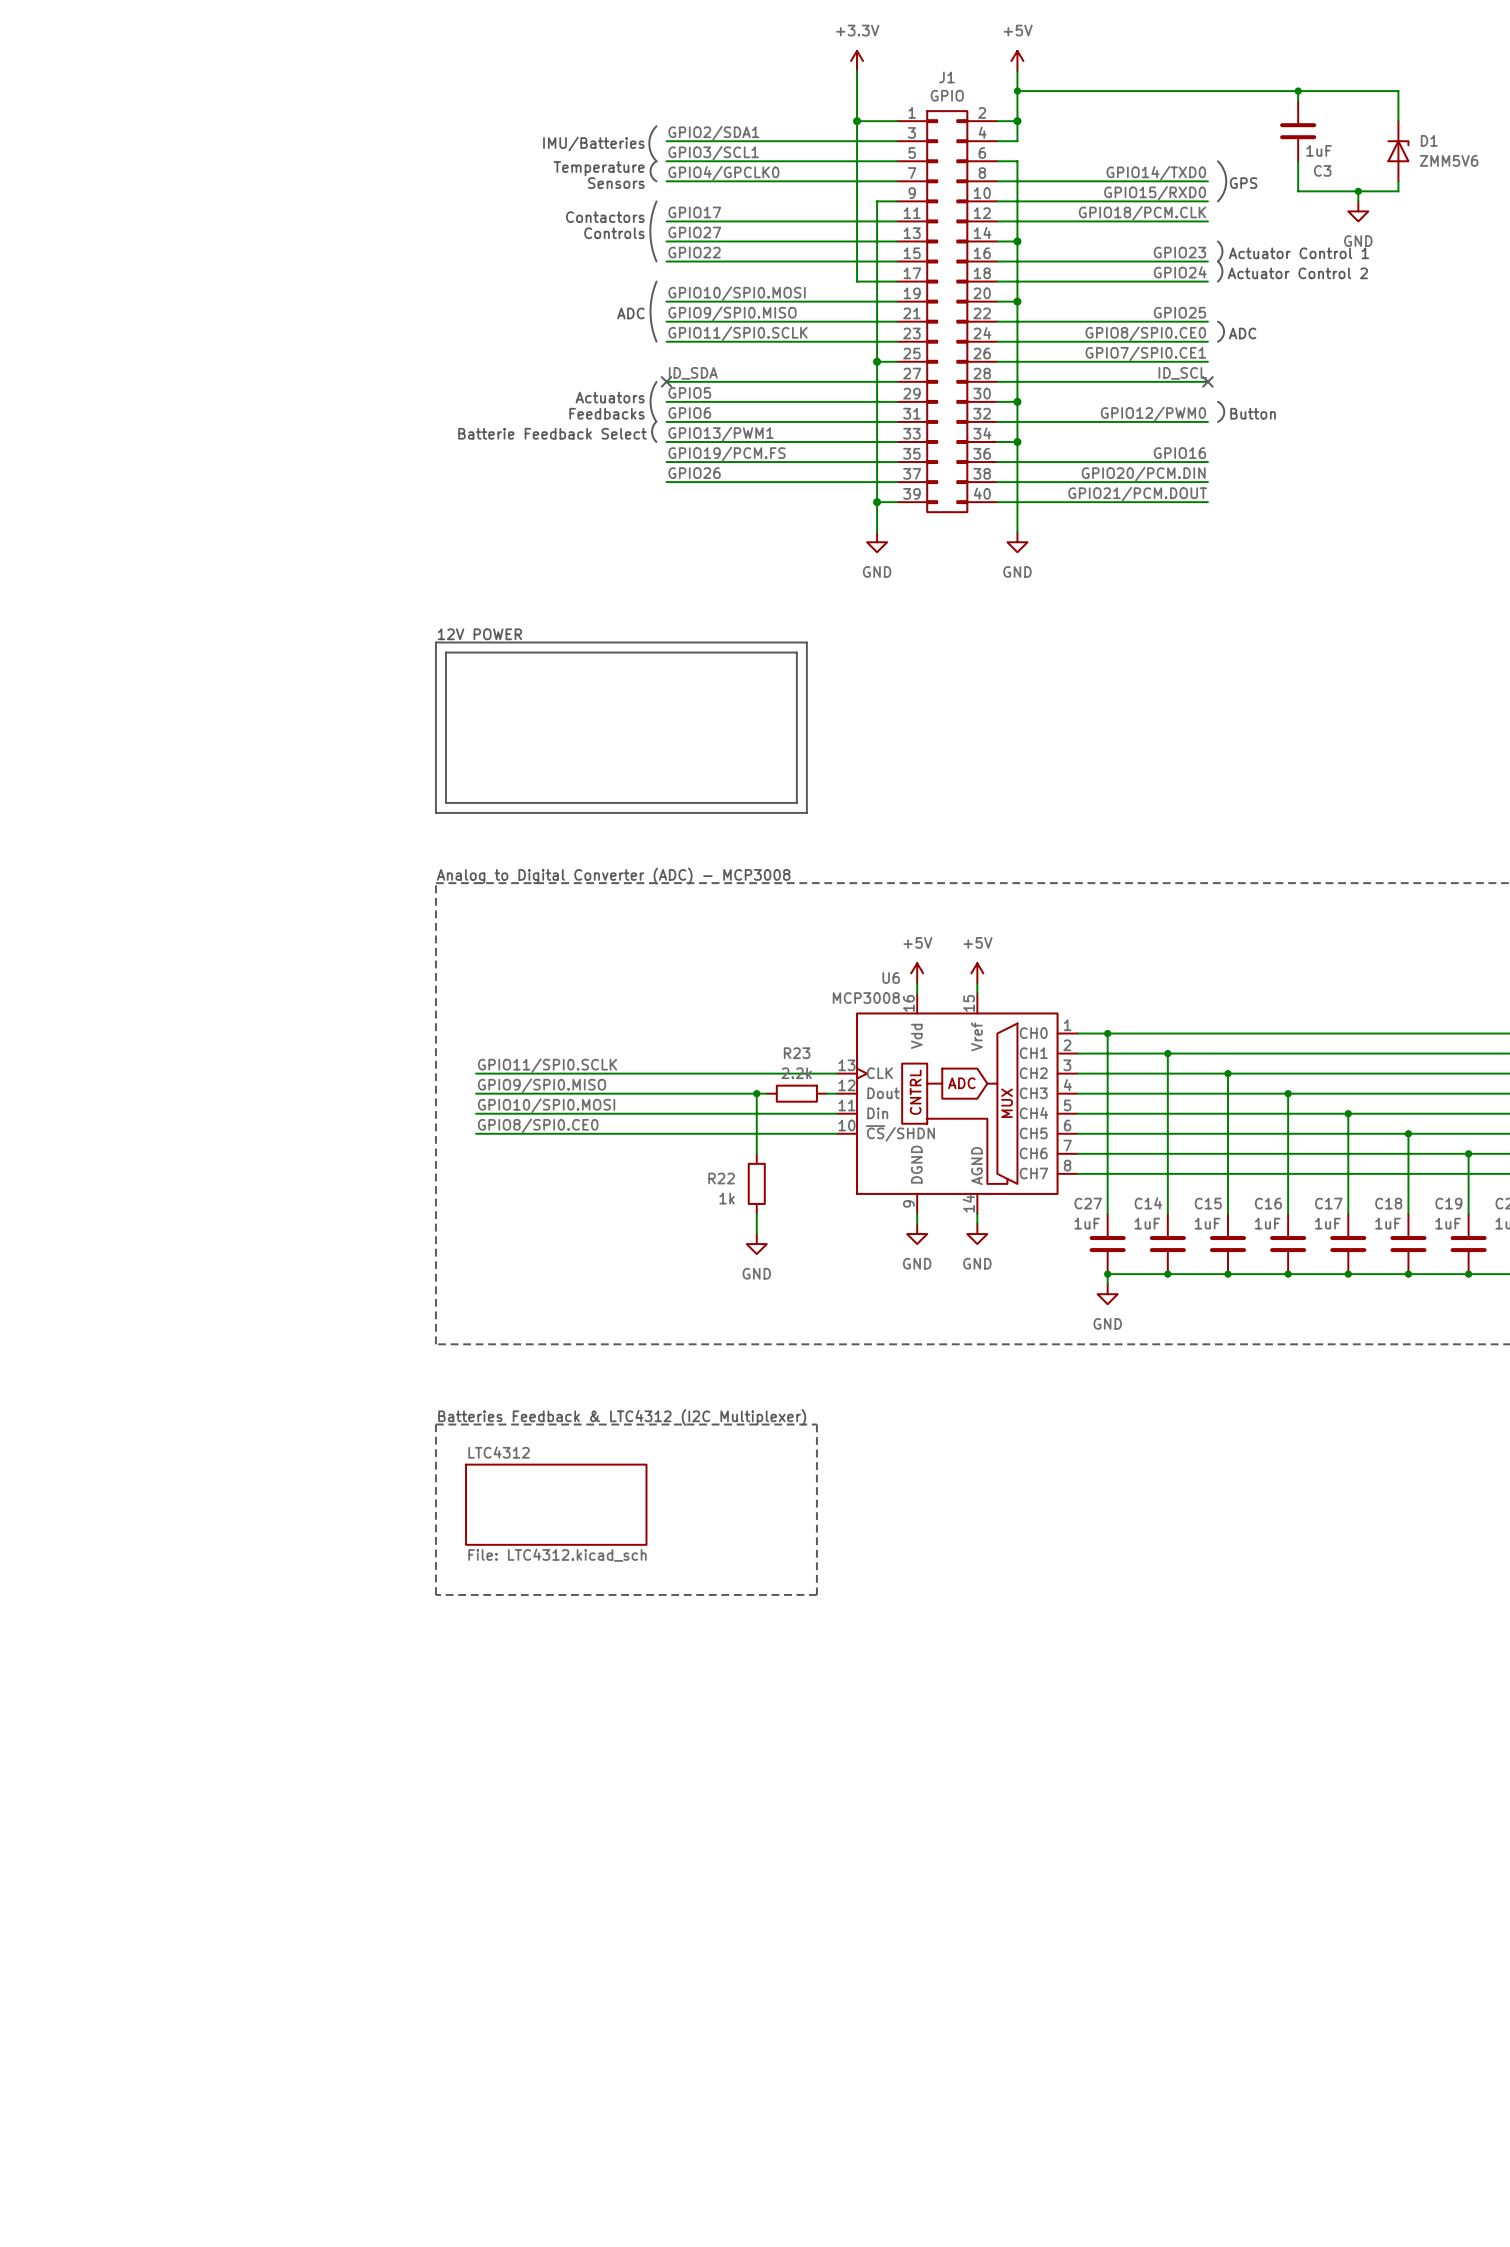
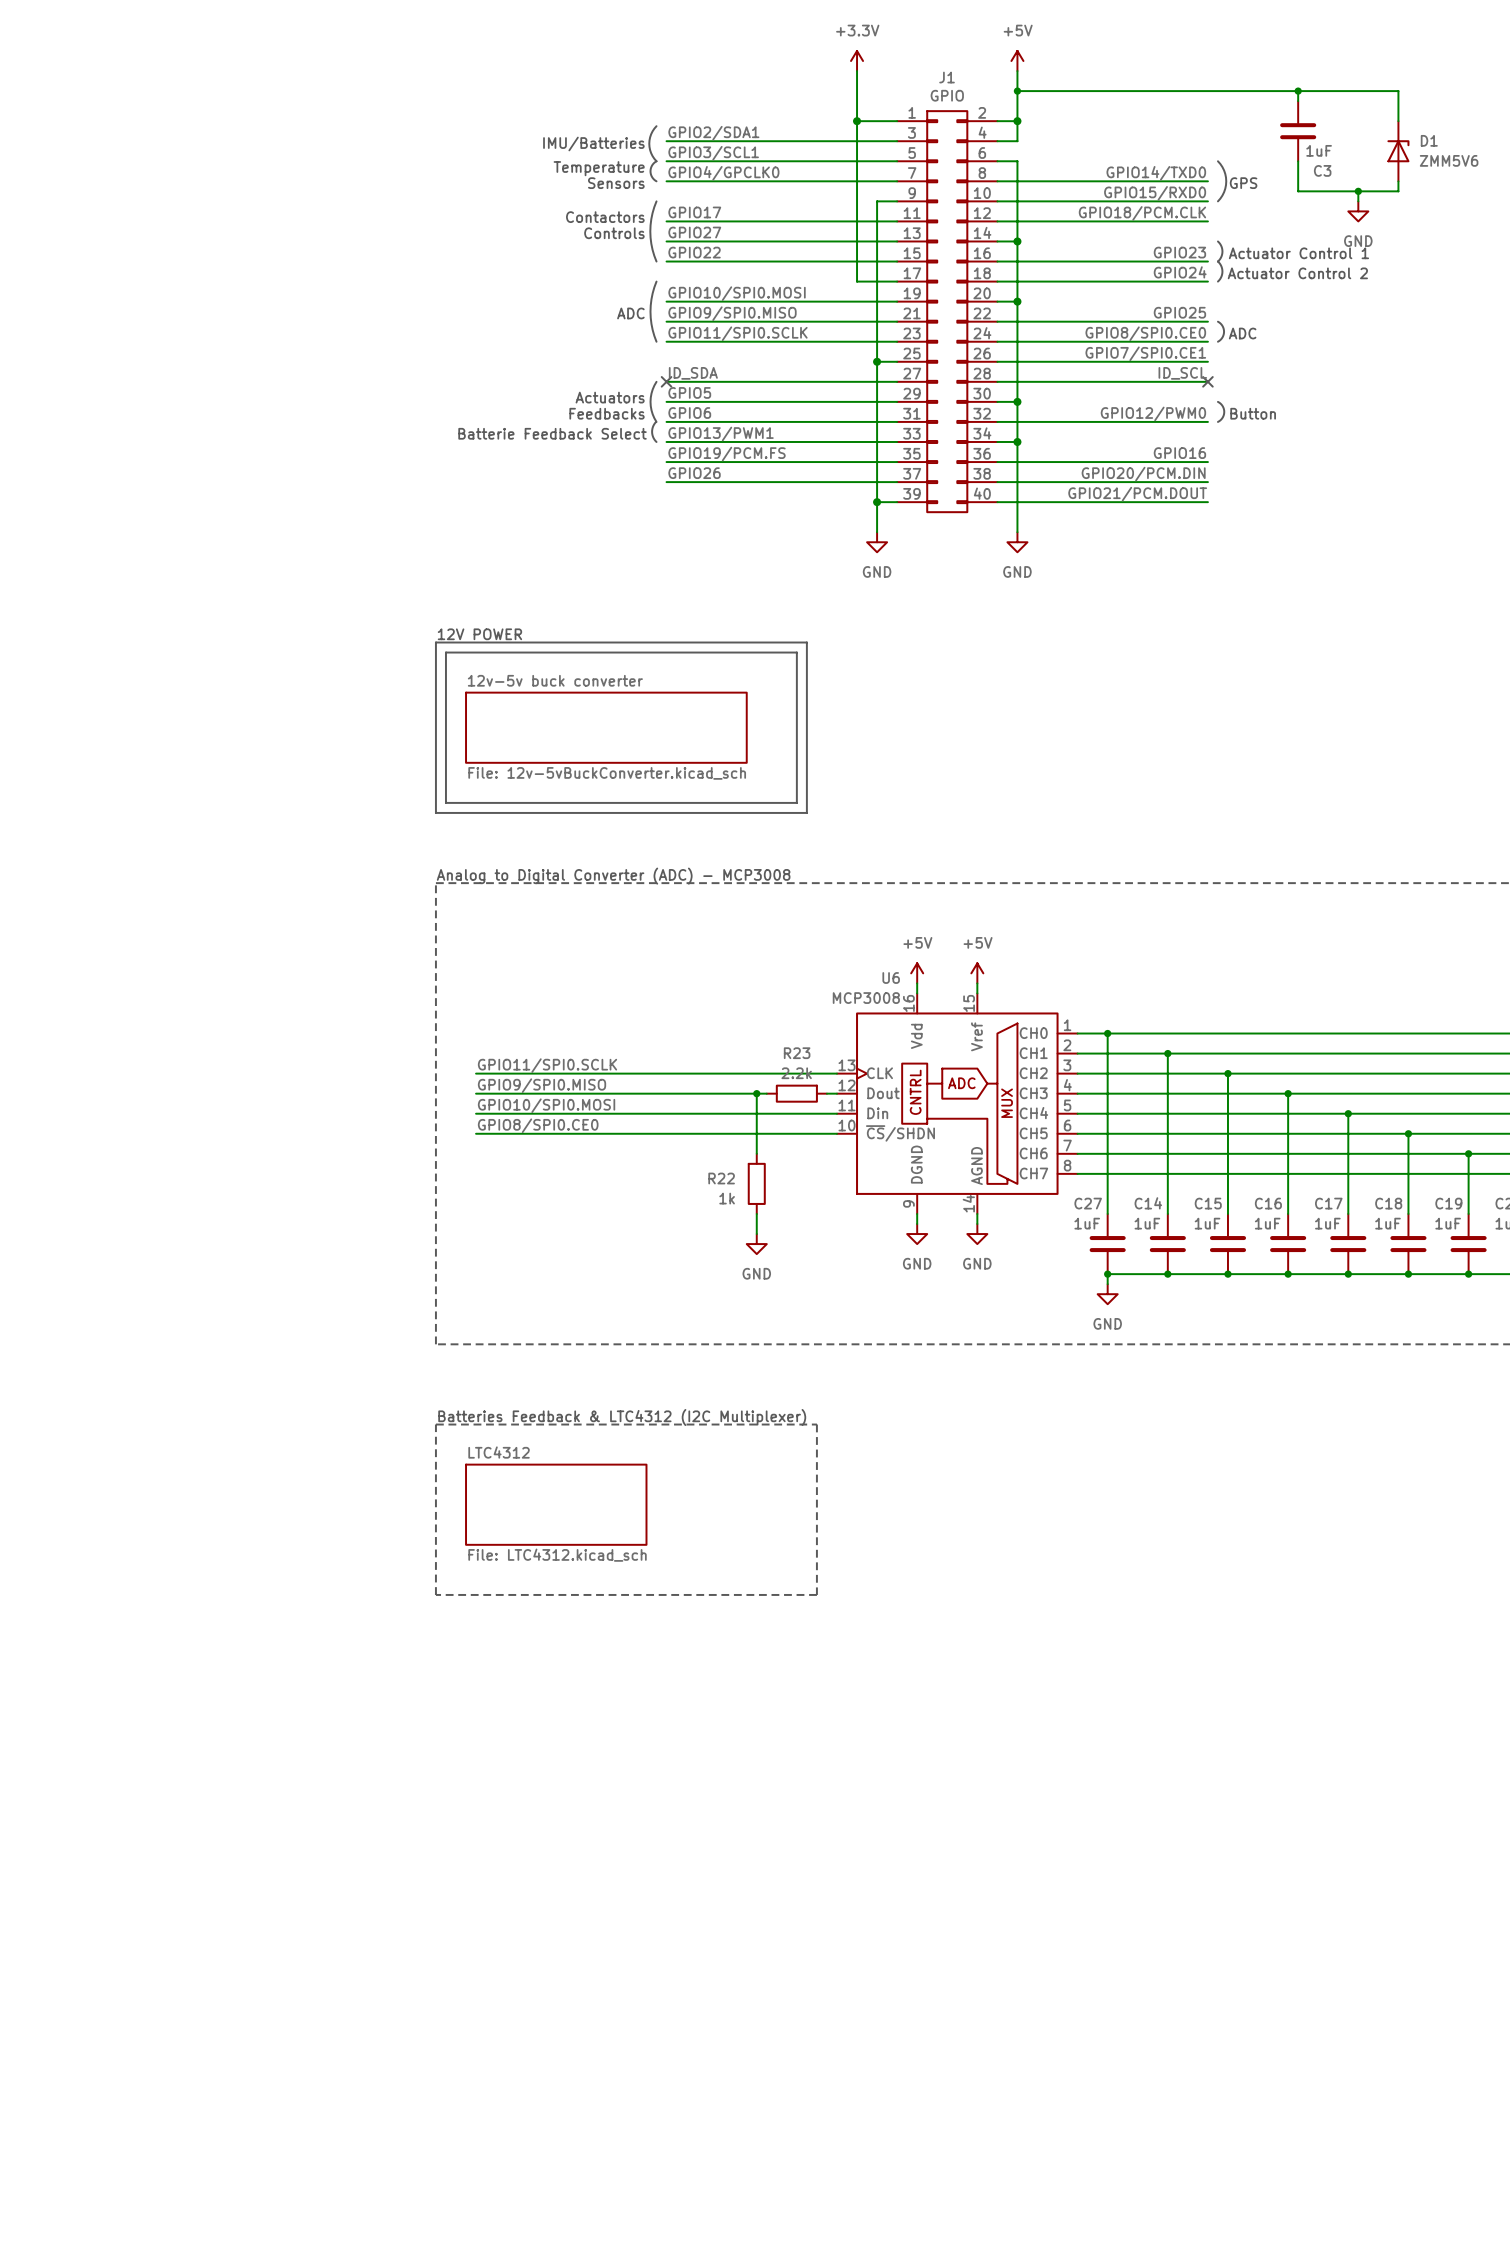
sheet 12v-5v buck converter: none -> File: 12v-5vBuckConverter.kicad_sch (606, 727)

